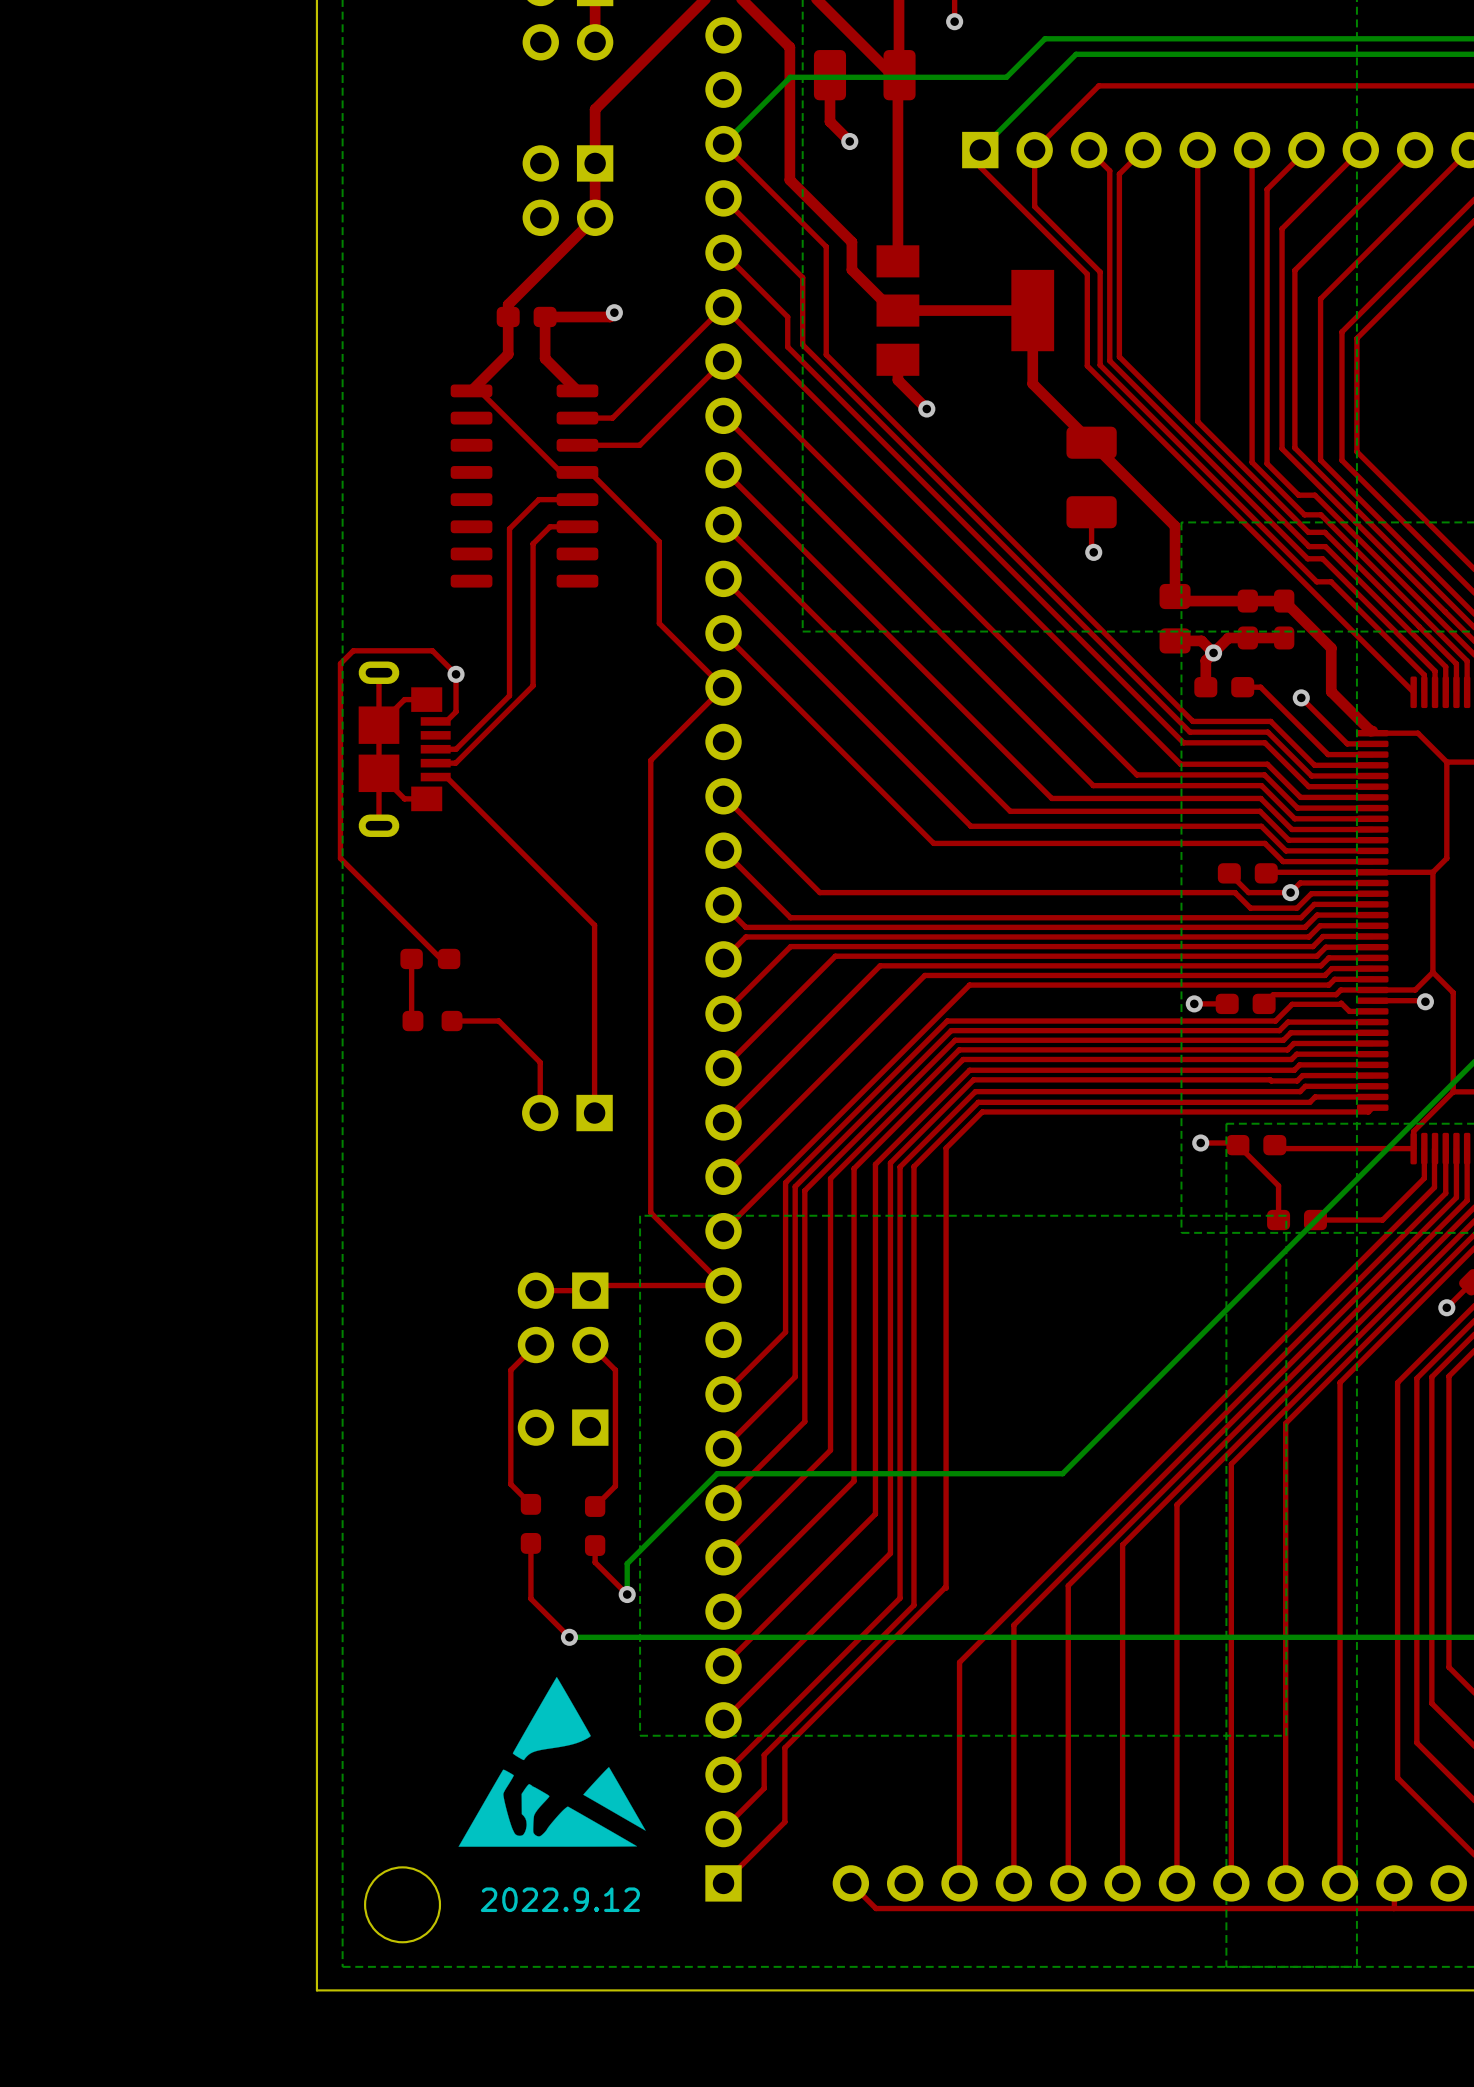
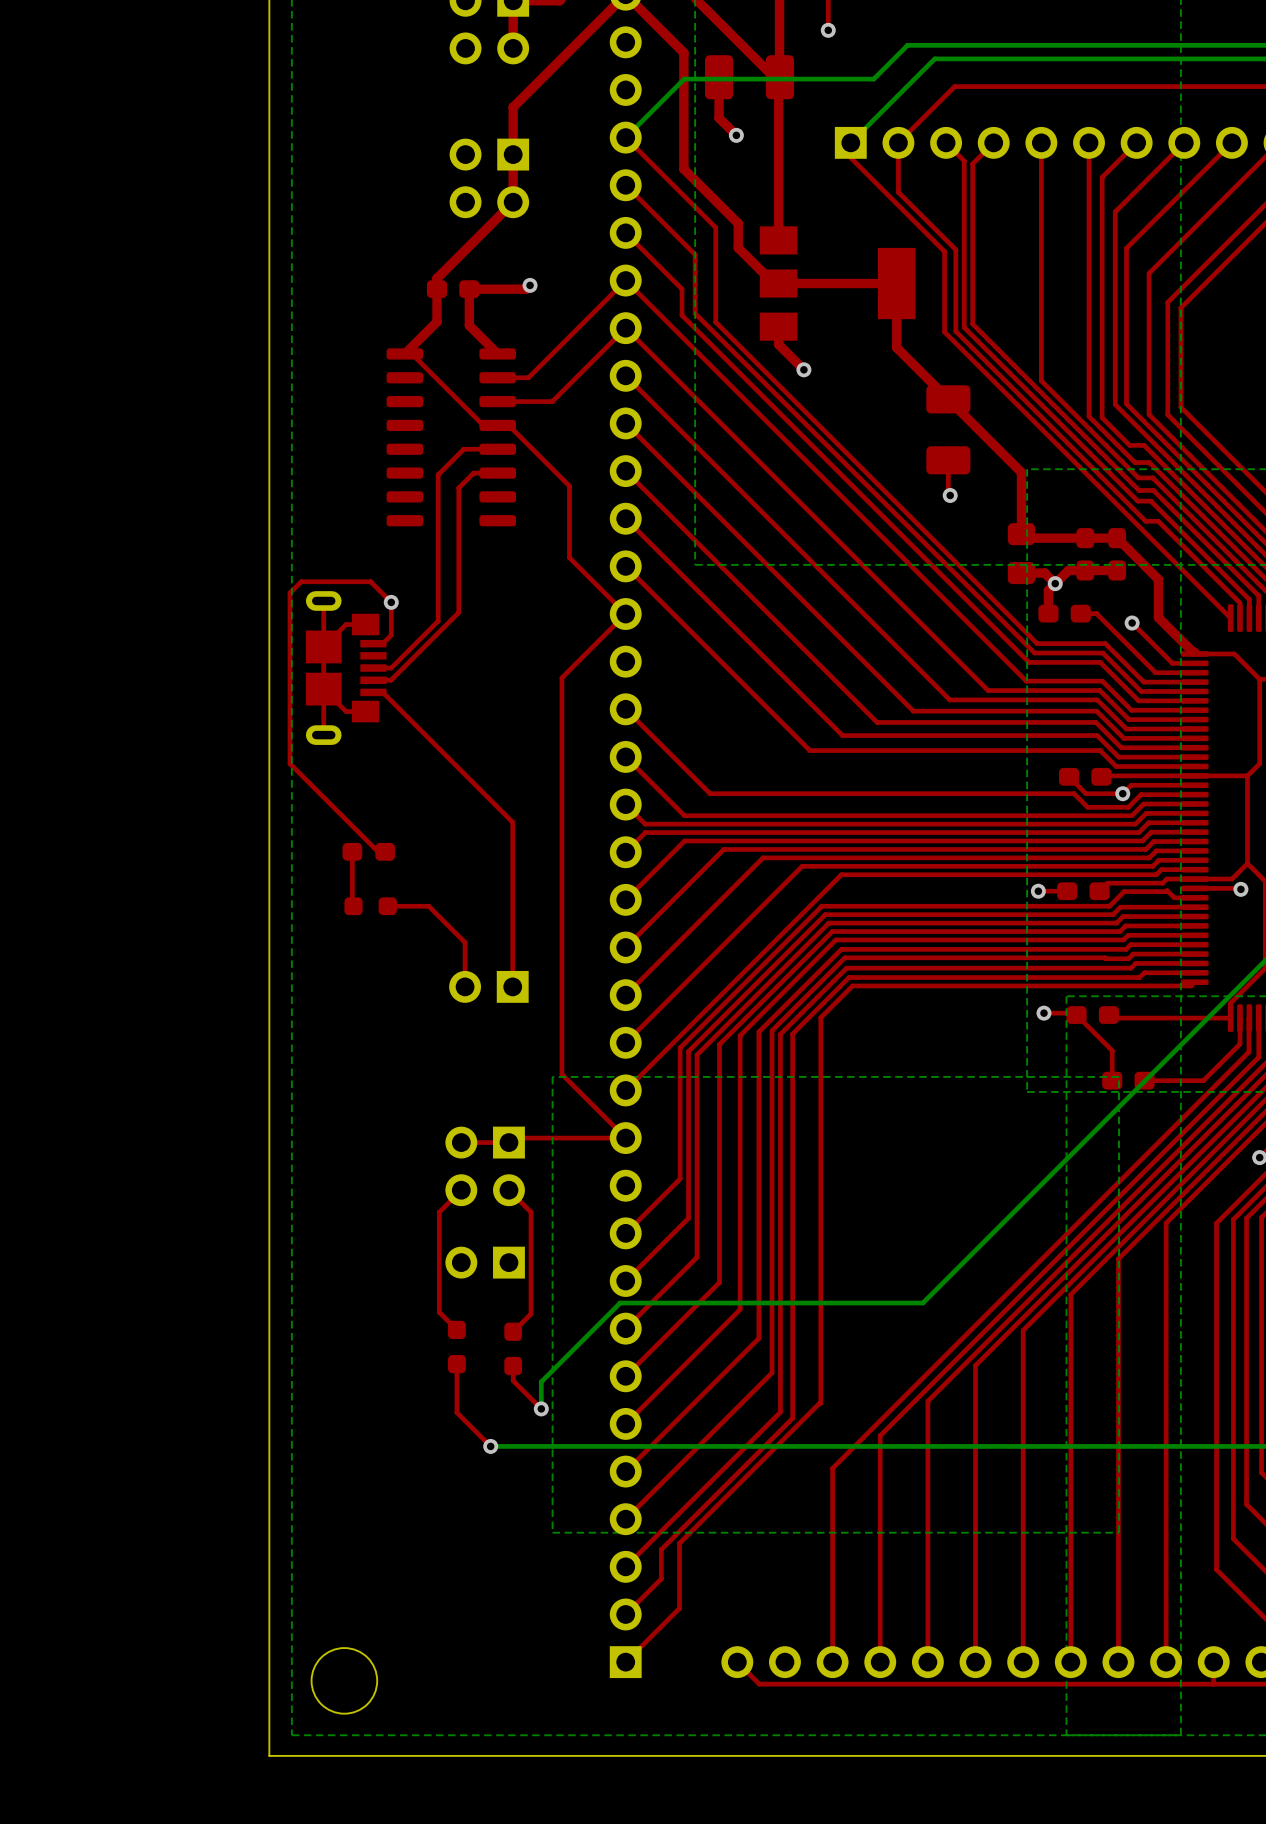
drawing: [458, 1676, 646, 1847] -> none
text: 2022.9.12 (560, 1899) -> none

